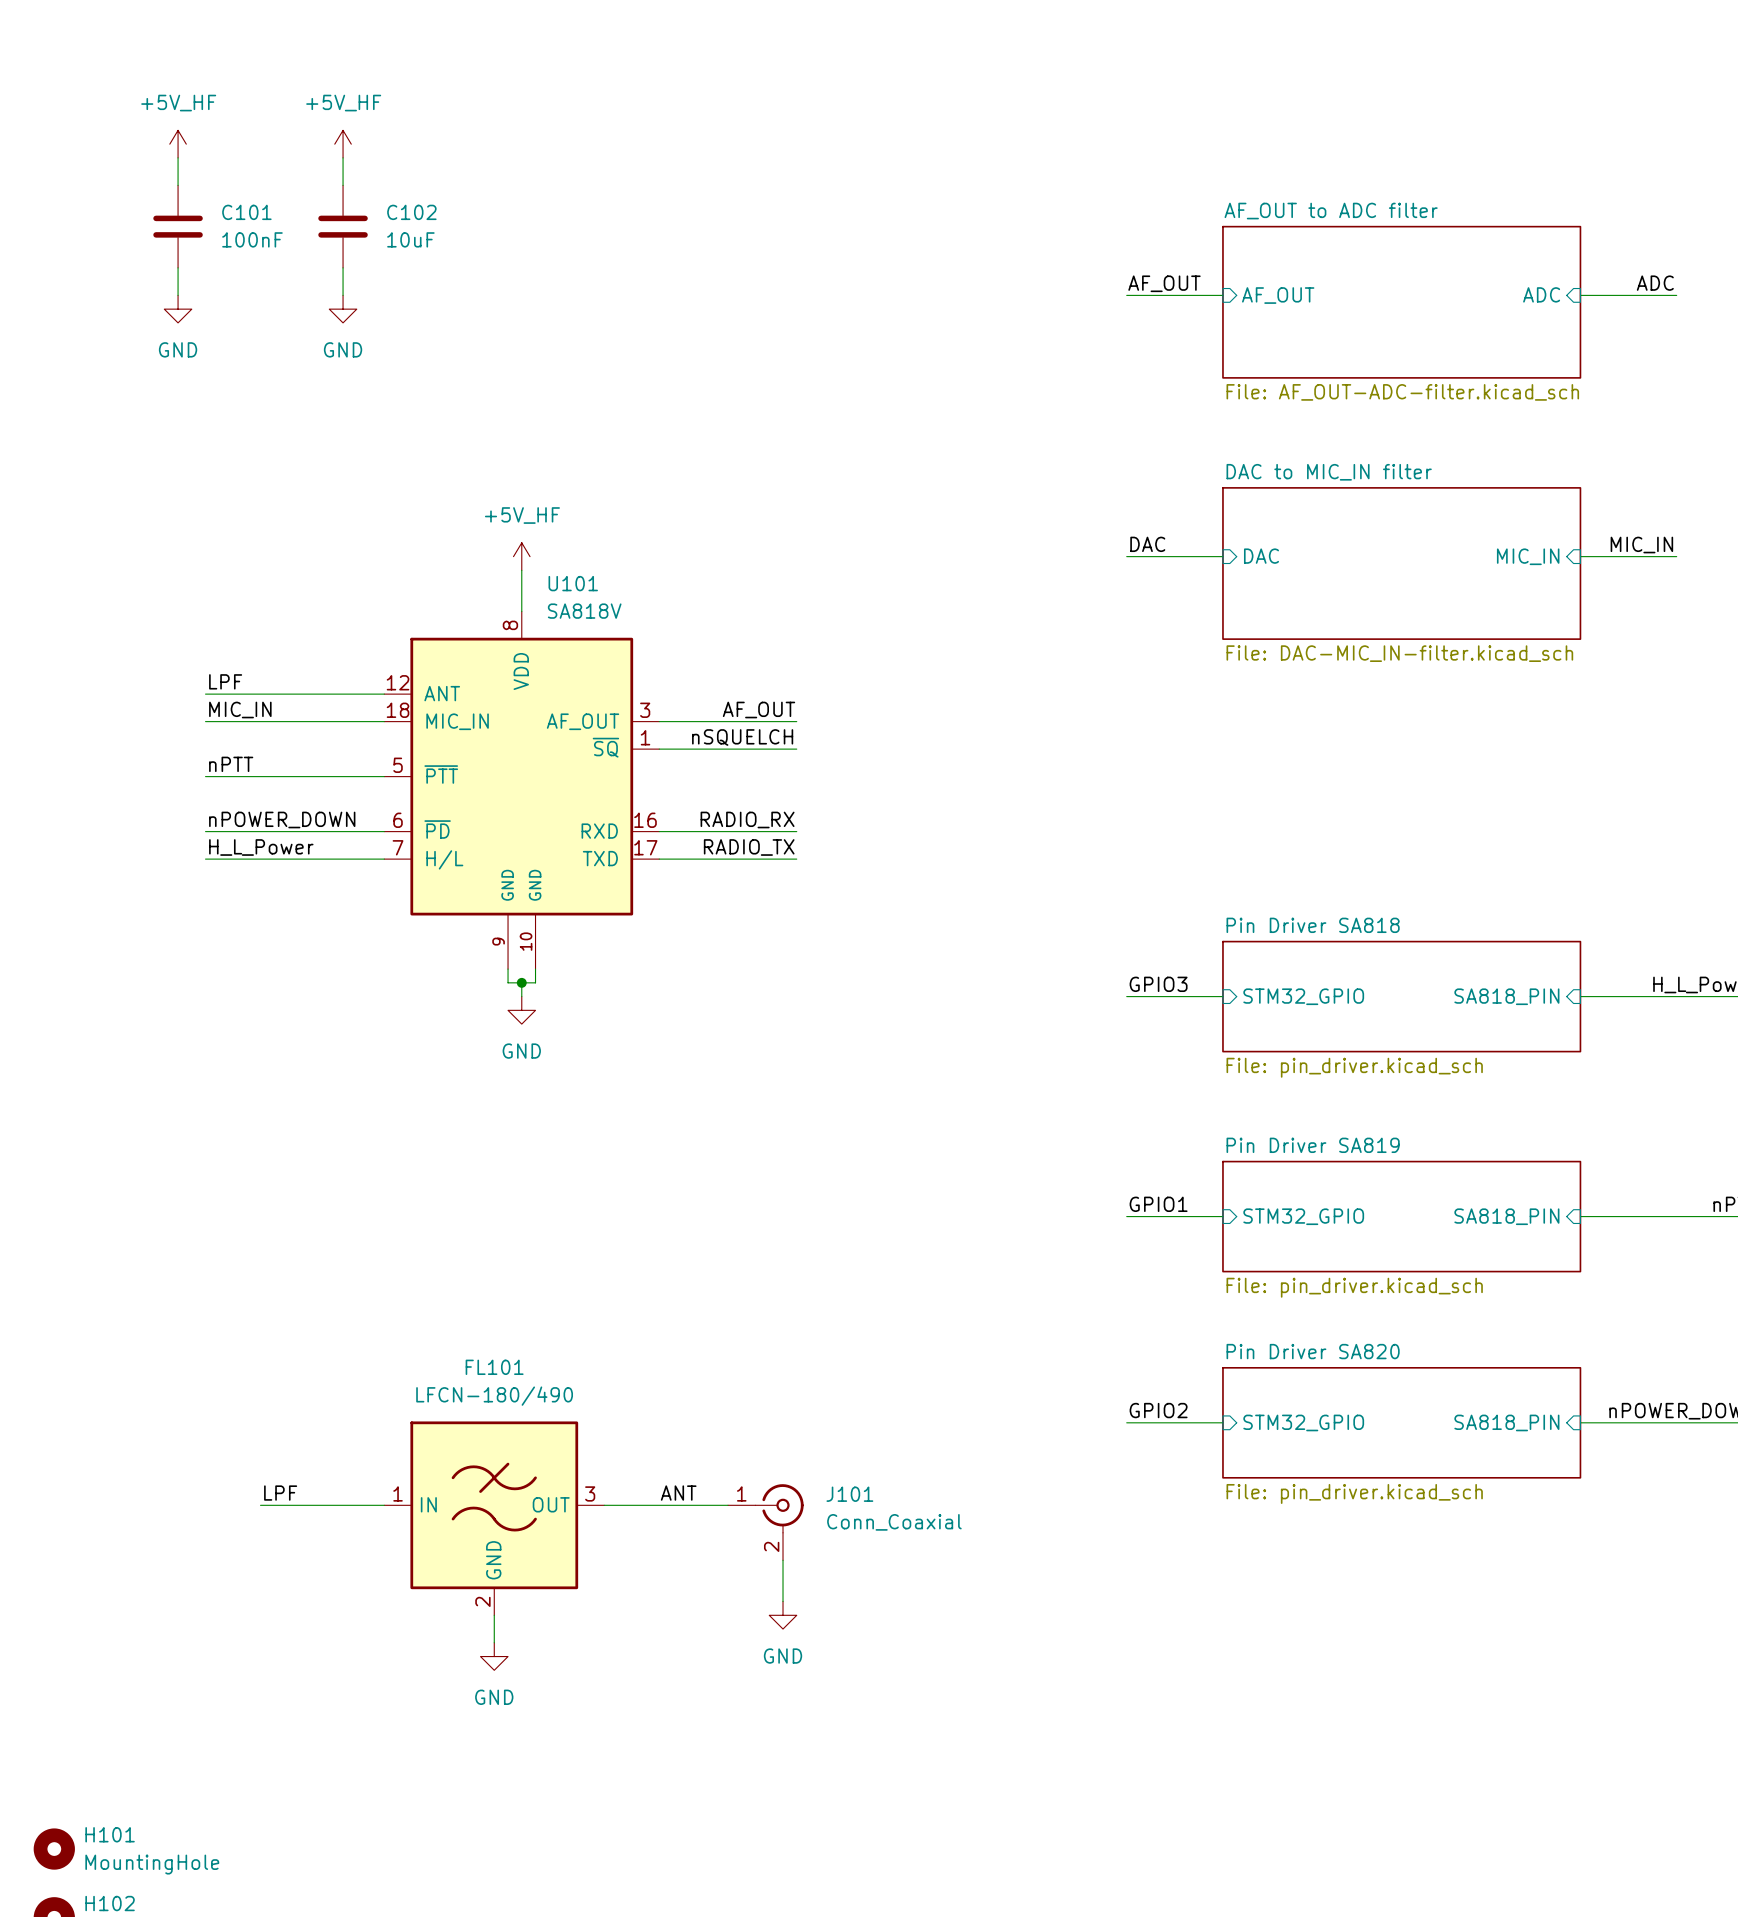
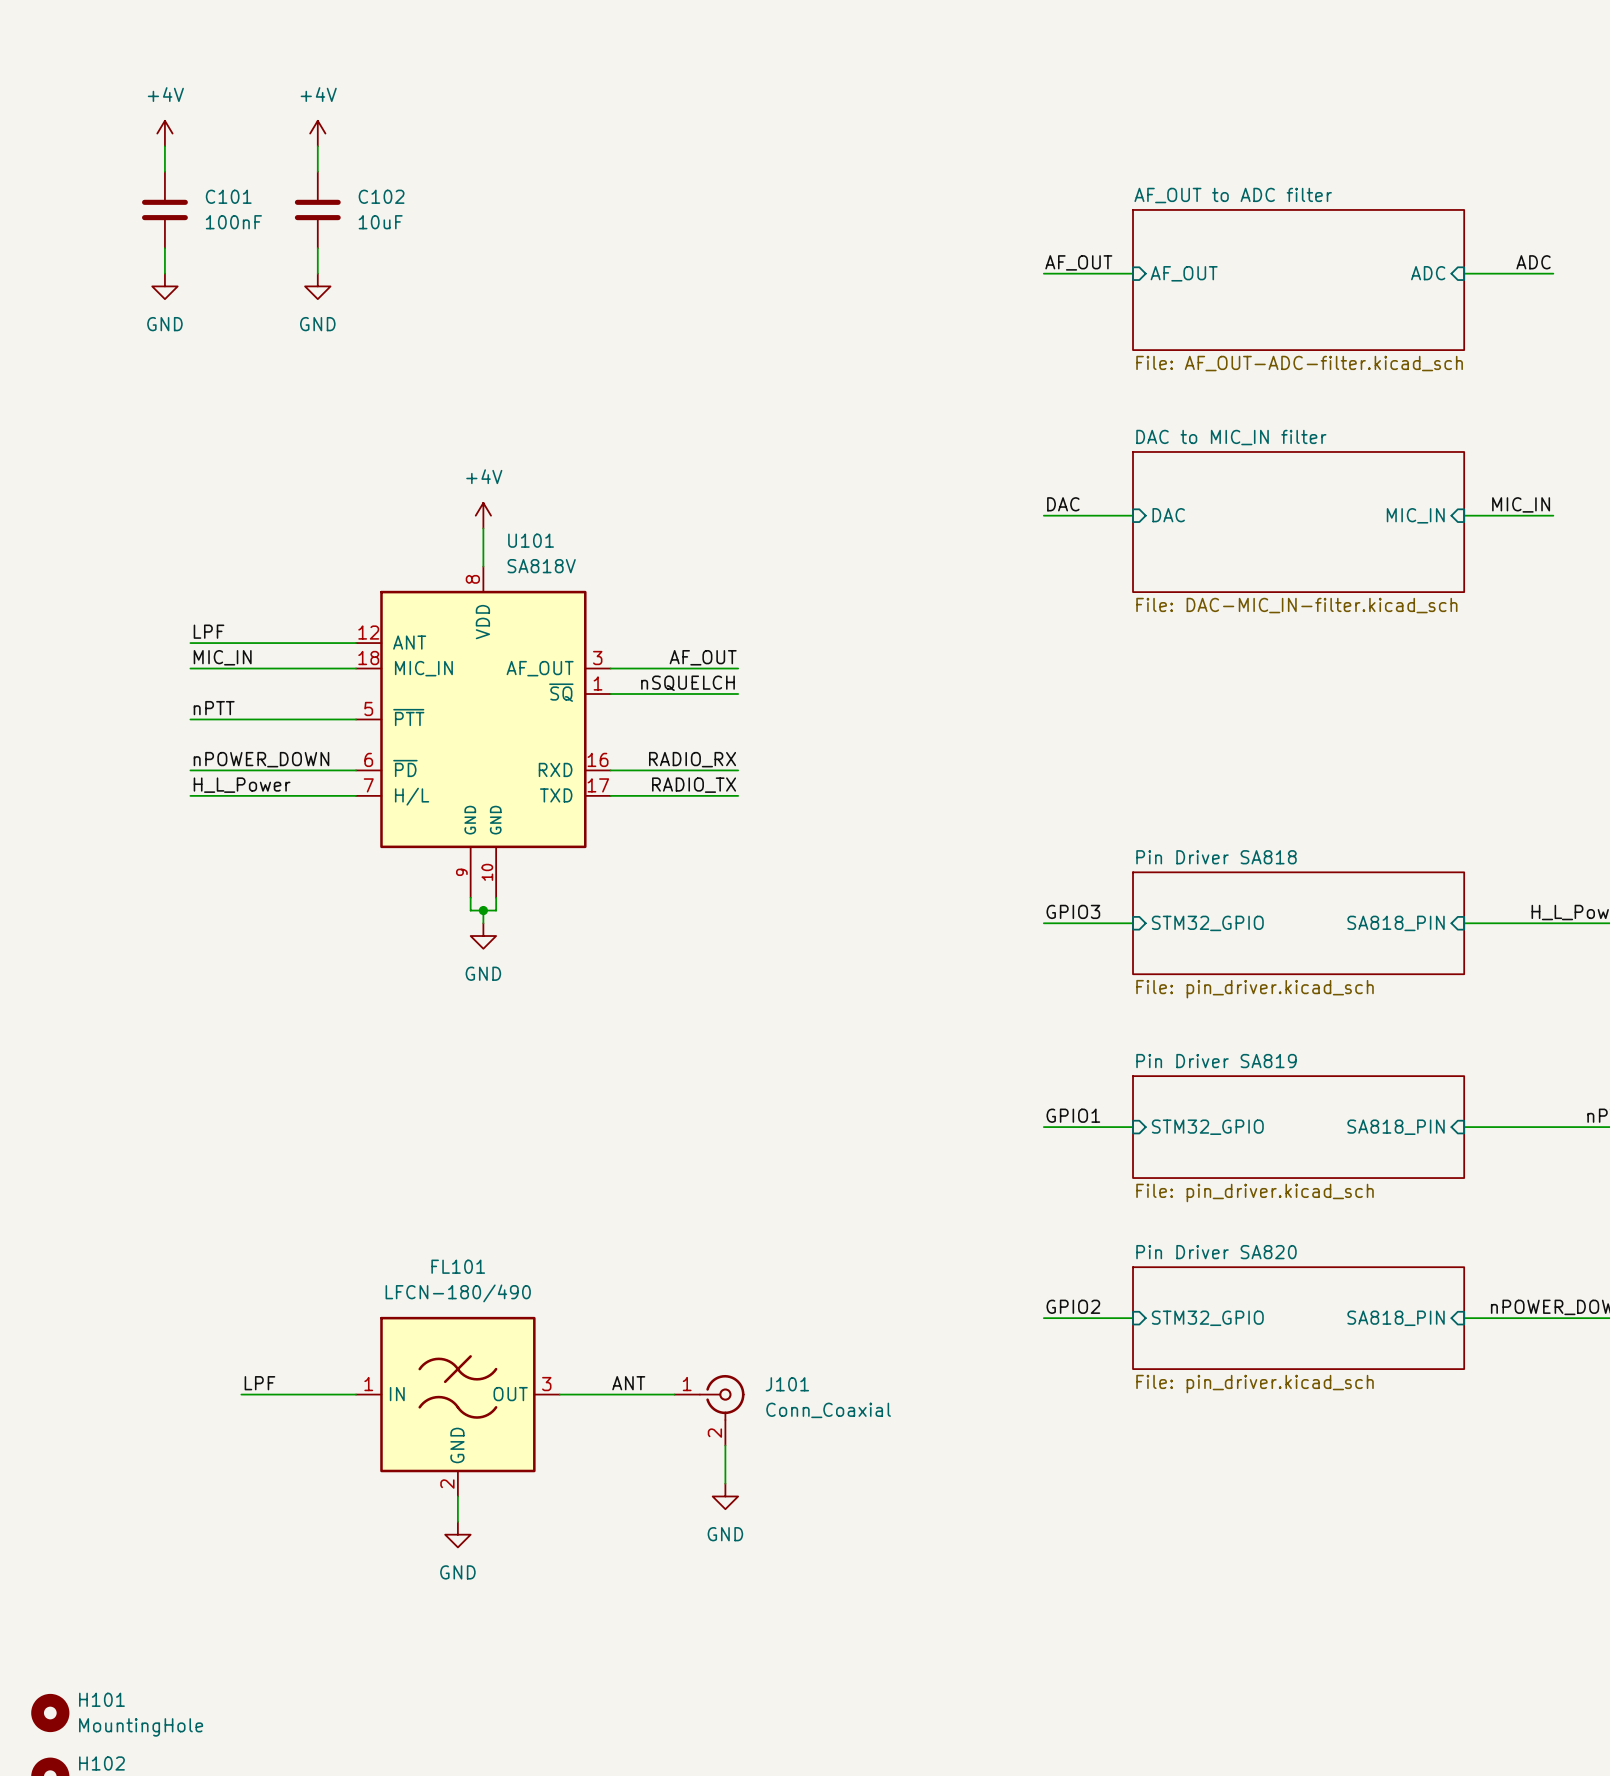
power symbol: +5V_HF (178, 144) -> +4V (164, 133)
power symbol: +5V_HF (343, 144) -> +4V (317, 133)
power symbol: +5V_HF (521, 556) -> +4V (483, 515)

